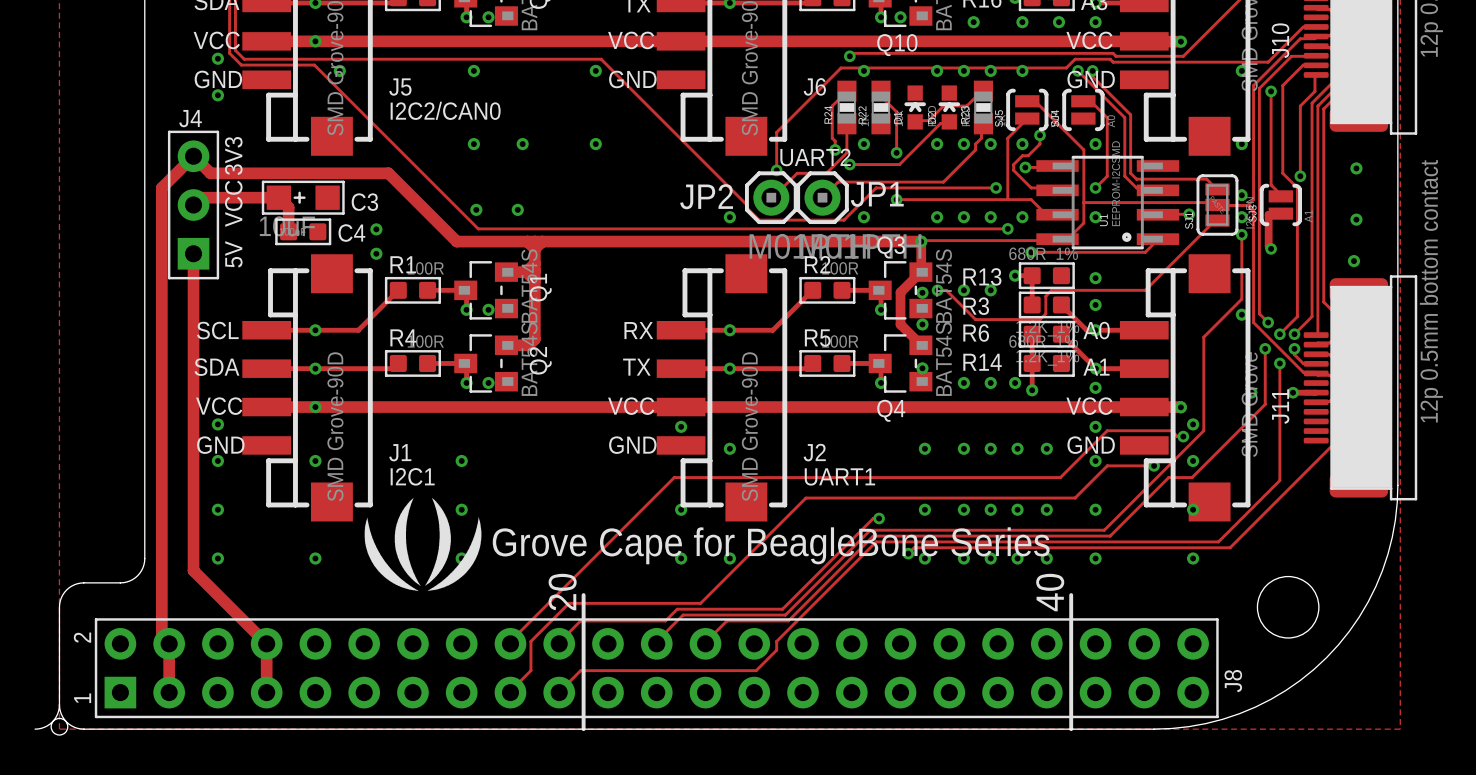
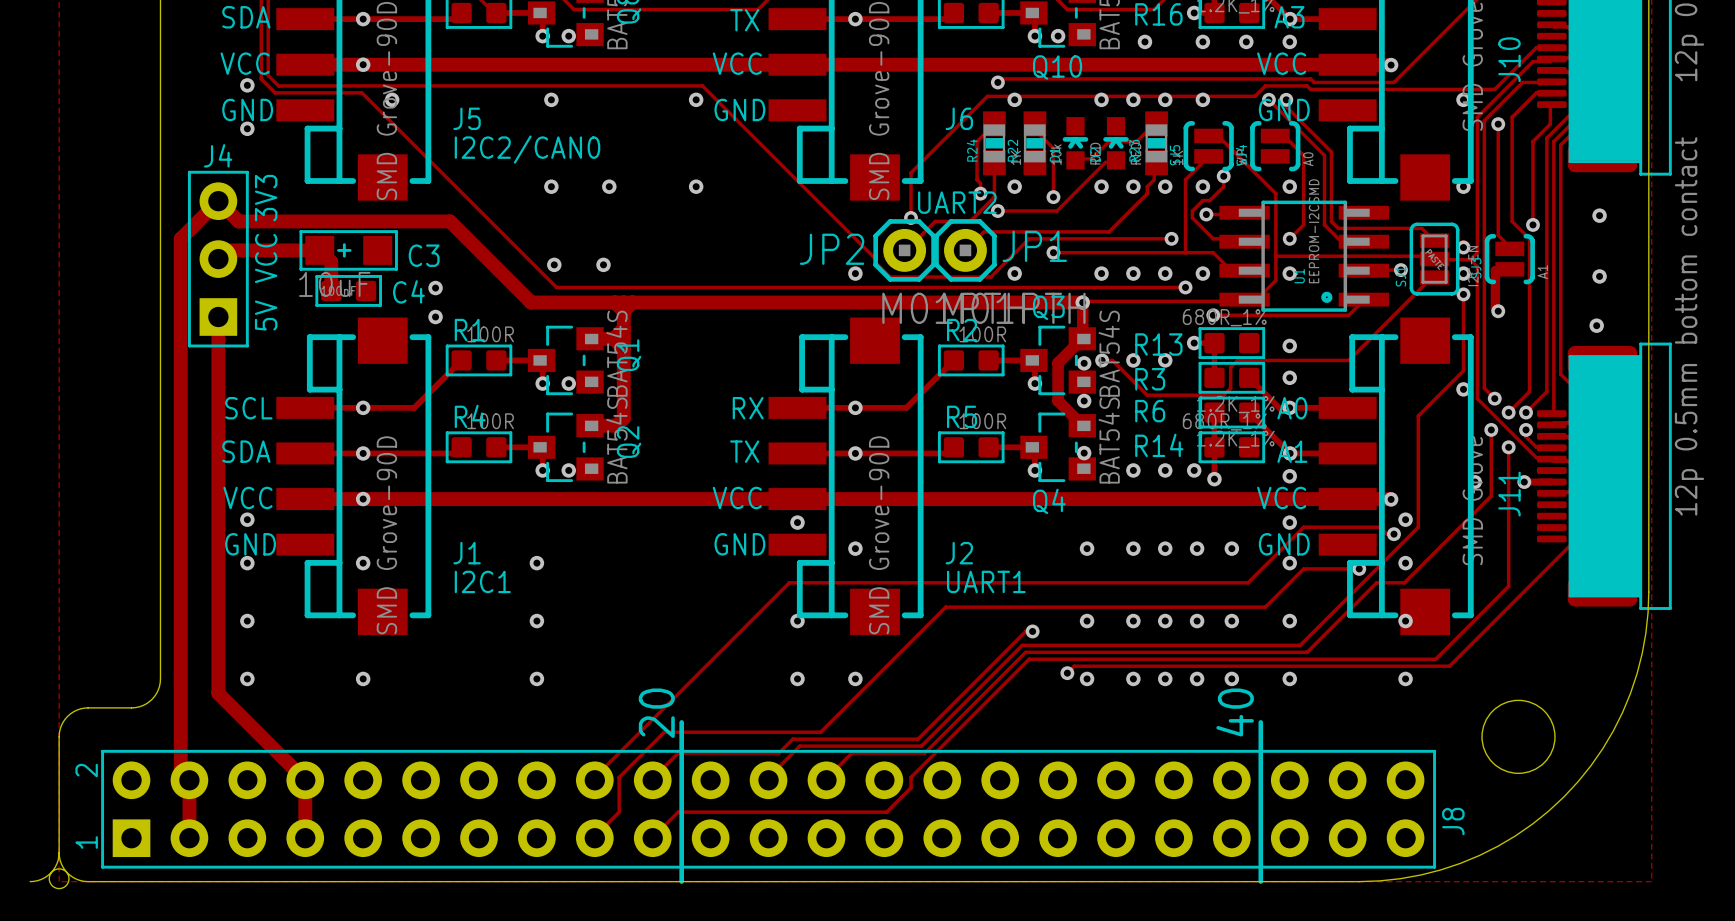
drawing: [364, 498, 482, 591] -> none
text: Grove Cape for BeagleBone Series (771, 545) -> none

